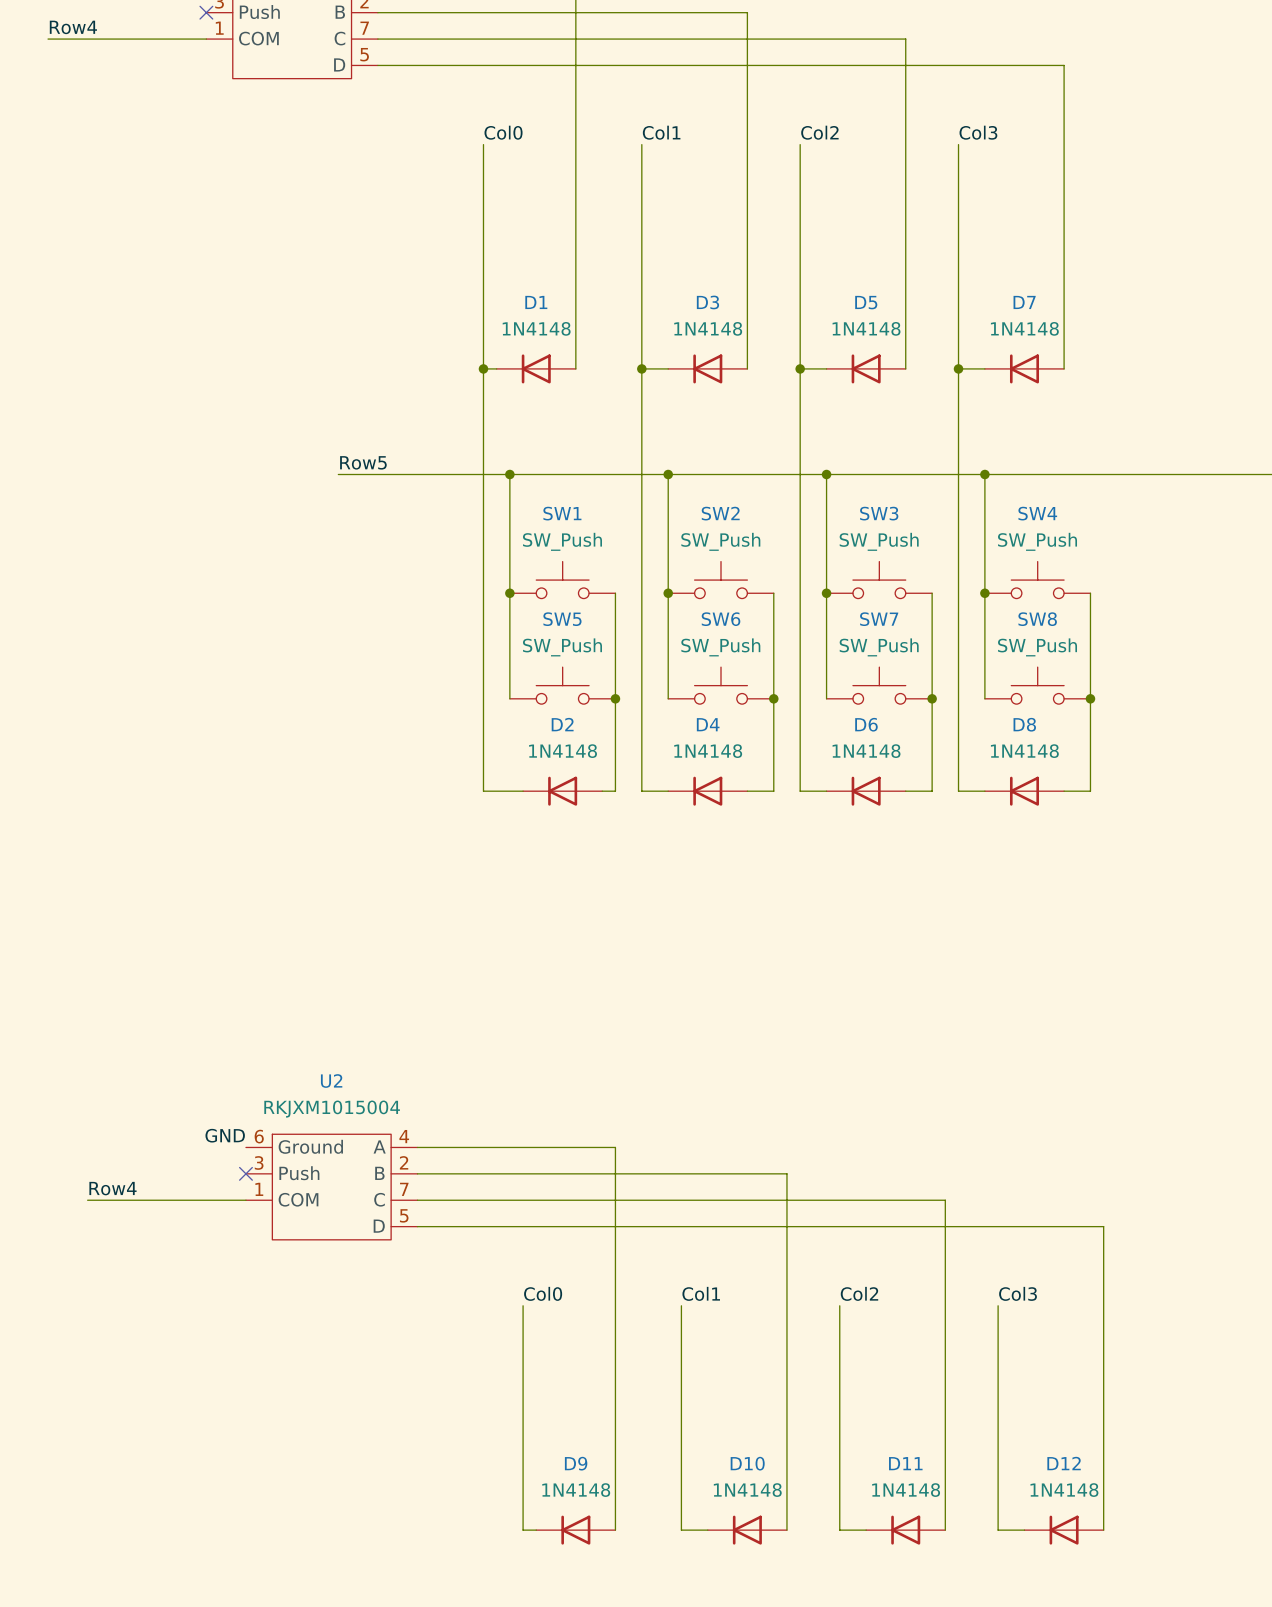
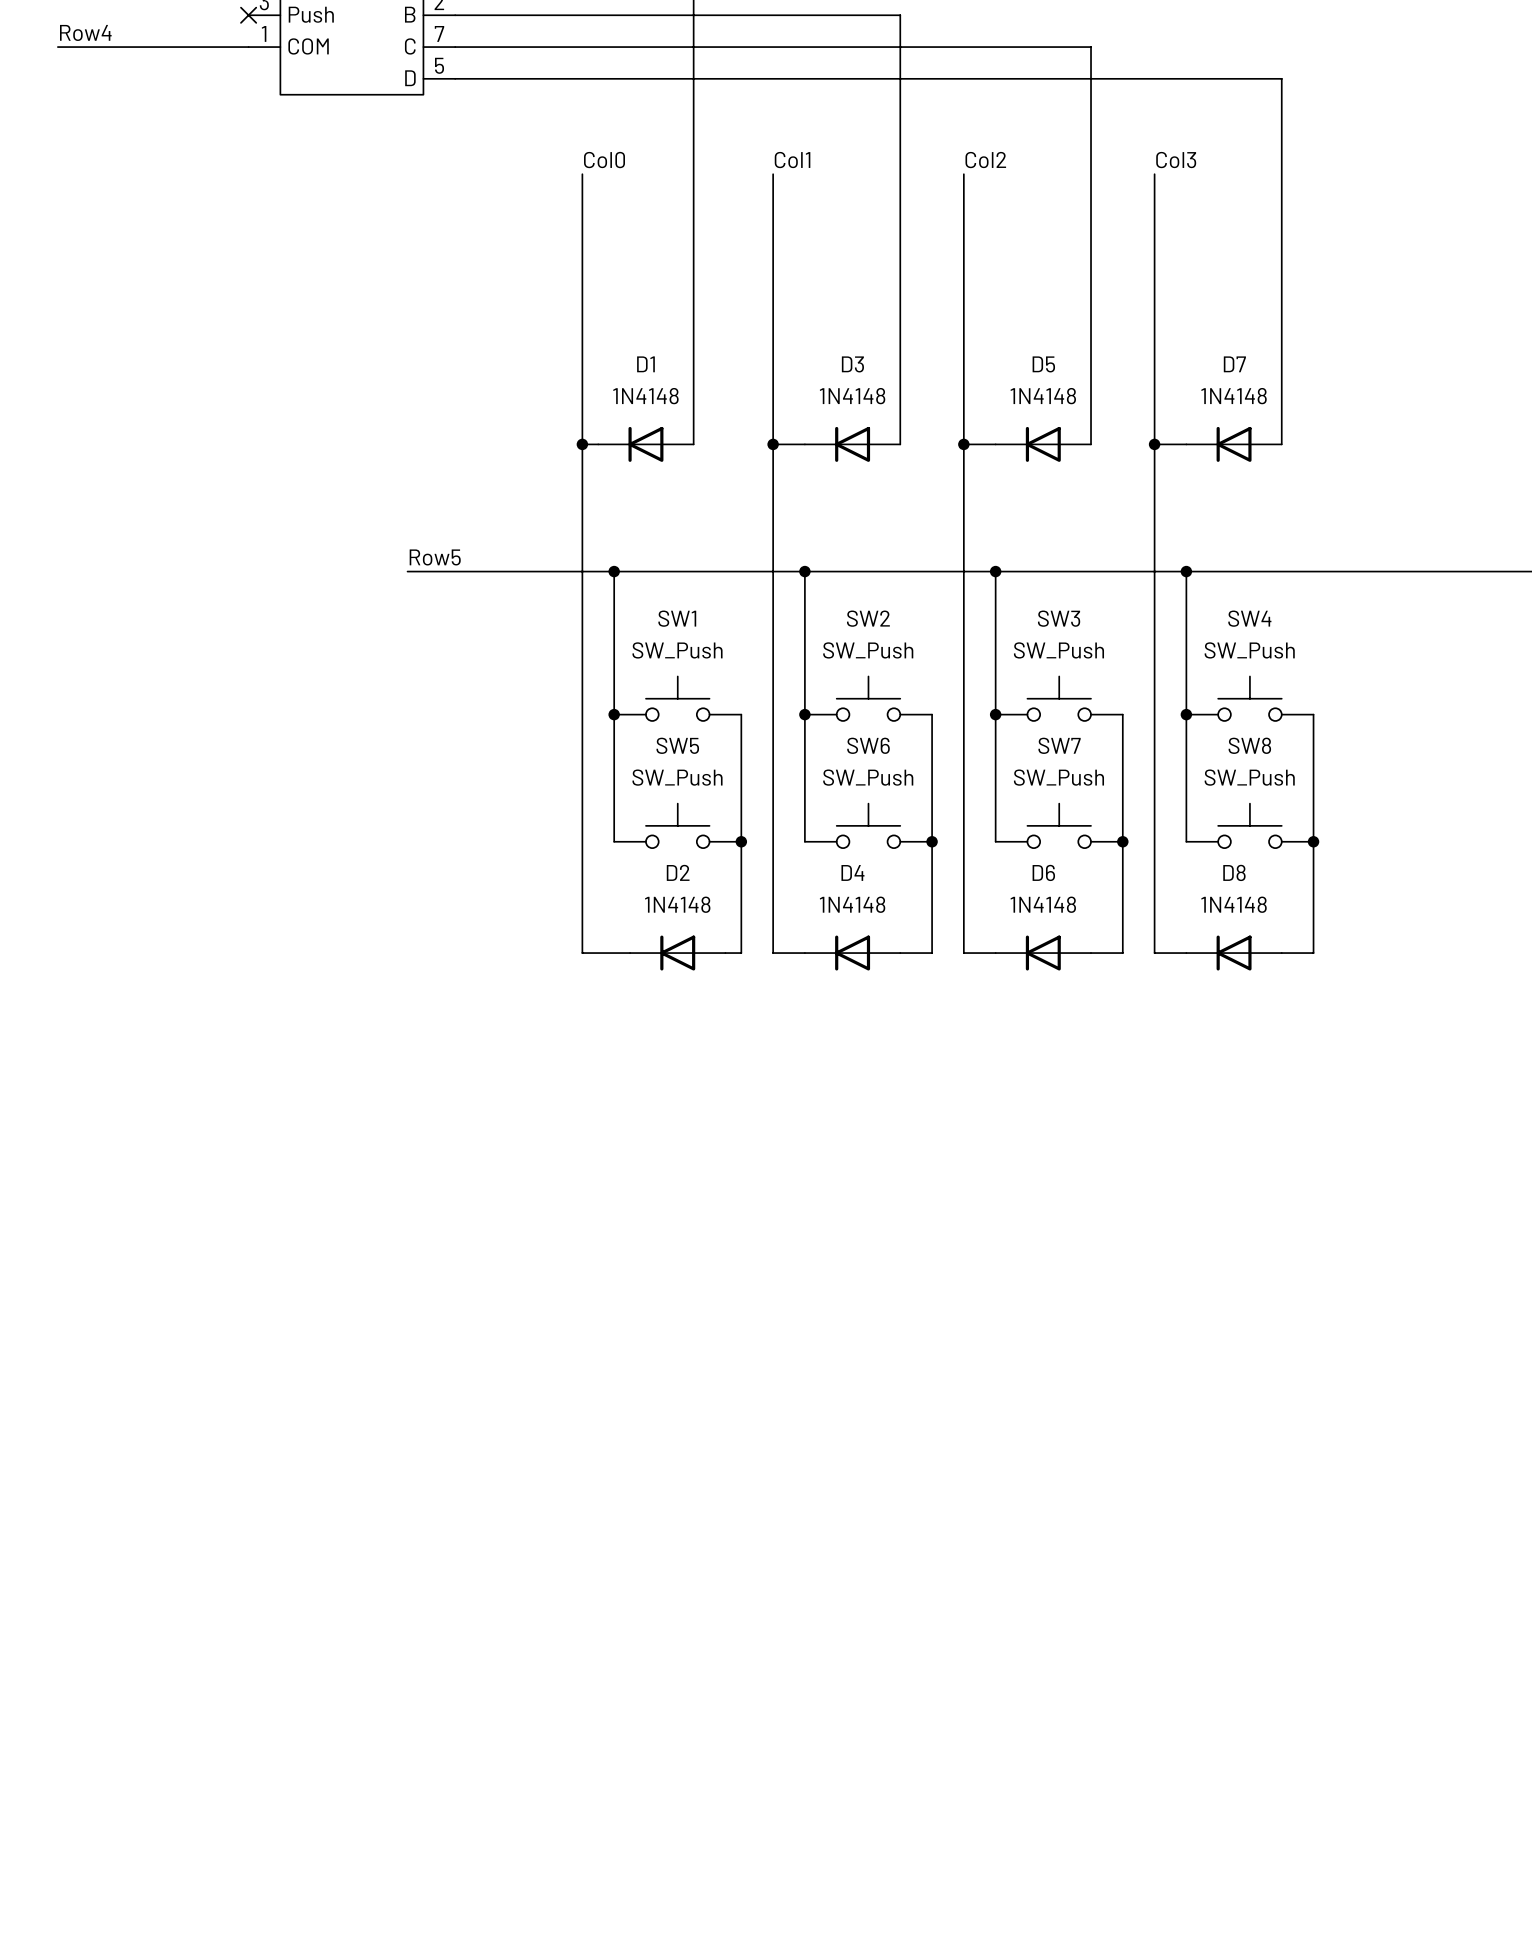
label: GND (225, 1135) -> none
wire: (417, 1147) (615, 1147) (615, 1530) -> none
no-connect mark: (245, 1173) -> none
wire: (417, 1173) (786, 1173) (786, 1530) -> none
U2: RKJXM1015004 (331, 1187) -> none
label: Row4 (112, 1188) -> none
wire: (87, 1200) (245, 1200) -> none
wire: (417, 1200) (945, 1200) (945, 1530) -> none
wire: (417, 1226) (1103, 1226) (1103, 1530) -> none
label: Col0 (543, 1293) -> none
label: Col1 (701, 1293) -> none
label: Col2 (859, 1293) -> none
label: Col3 (1018, 1293) -> none
wire: (523, 1305) (523, 1530) (536, 1530) -> none
wire: (681, 1305) (681, 1530) (707, 1530) -> none
wire: (839, 1305) (839, 1530) (866, 1530) -> none
wire: (998, 1305) (998, 1530) (1024, 1530) -> none
D9: 1N4148 (575, 1530) -> none
D10: 1N4148 (747, 1530) -> none
D11: 1N4148 (905, 1530) -> none
D12: 1N4148 (1064, 1530) -> none

